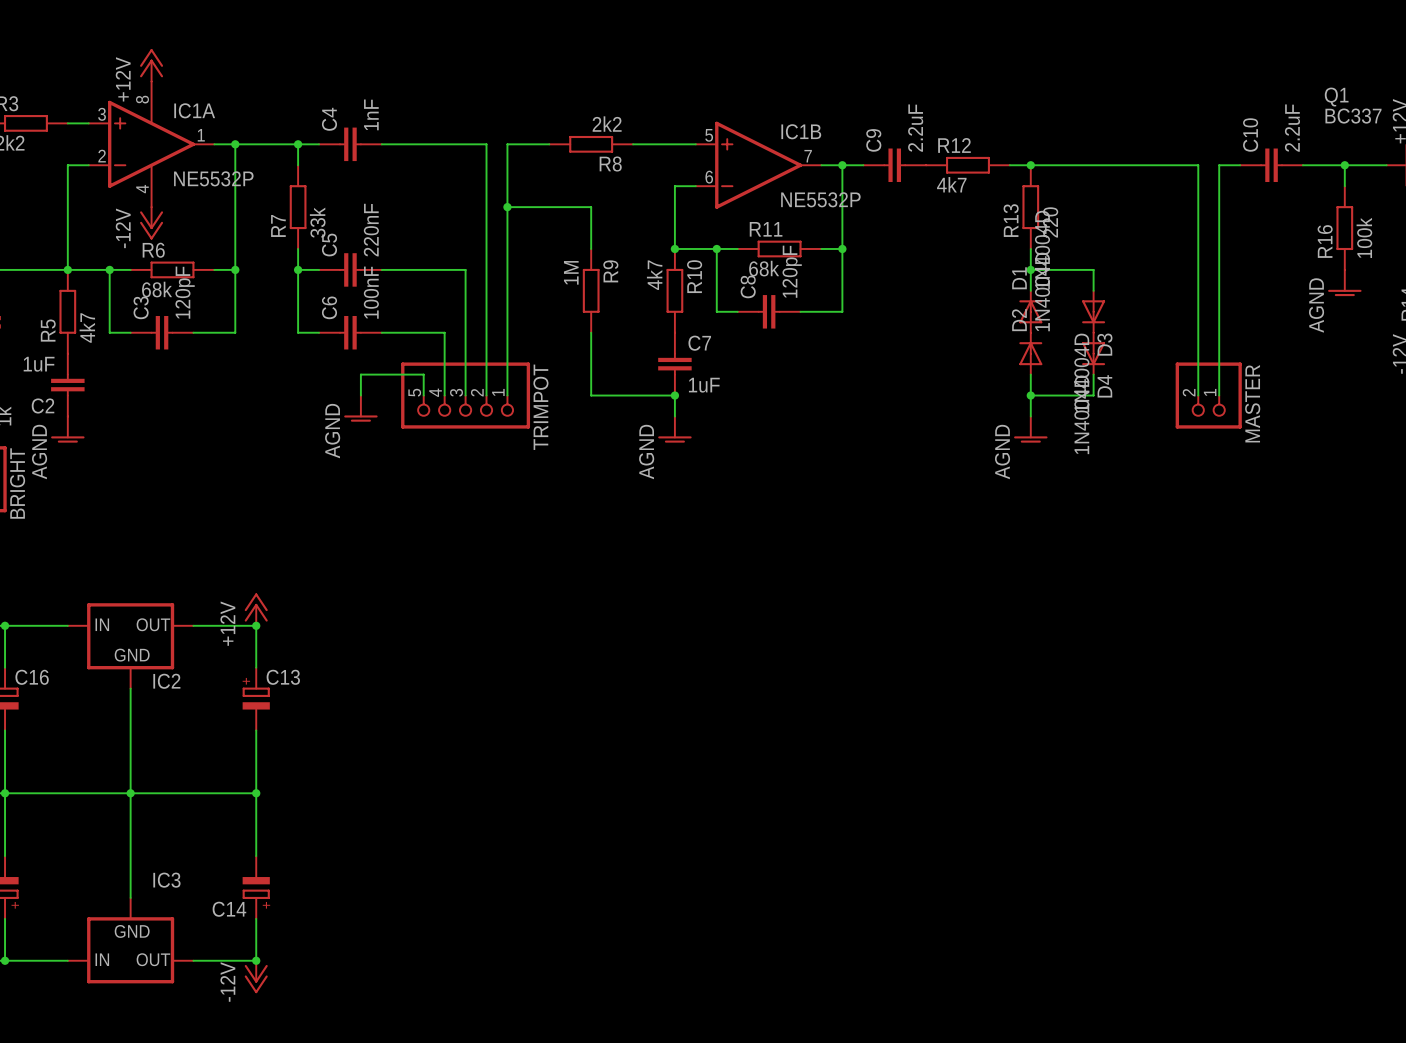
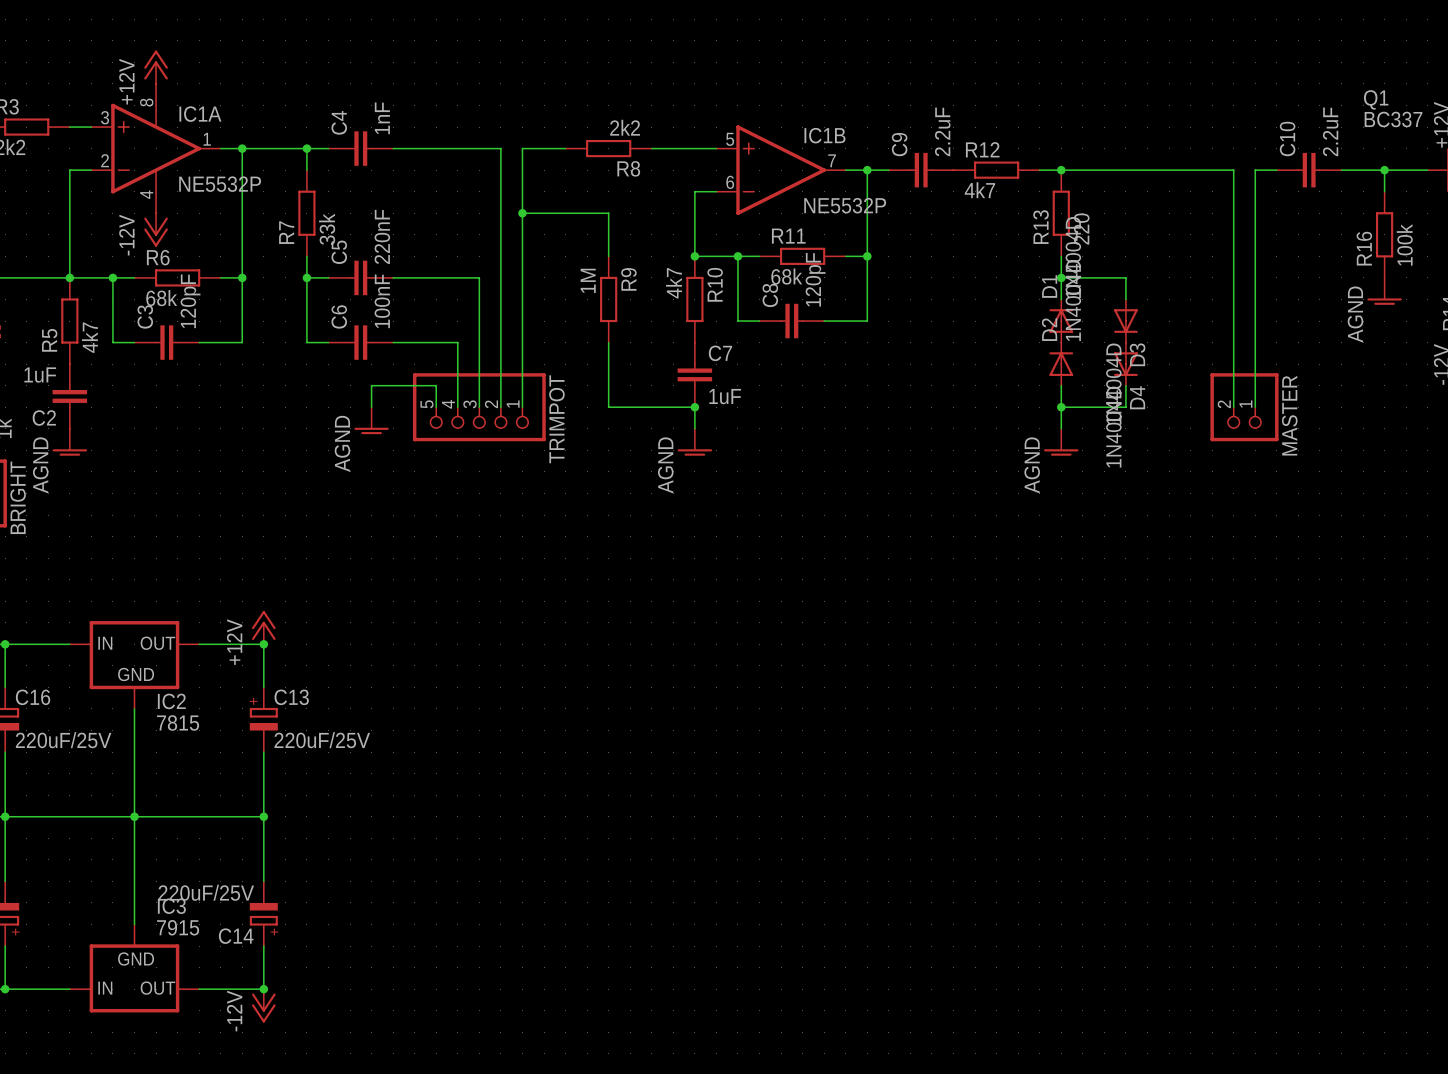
IC2 value: none -> 7815 (178, 722)
C16 value: none -> 220uF/25V (63, 740)
C13 value: none -> 220uF/25V (322, 740)
C14 value: none -> 220uF/25V (206, 892)
IC3 value: none -> 7915 (178, 927)

